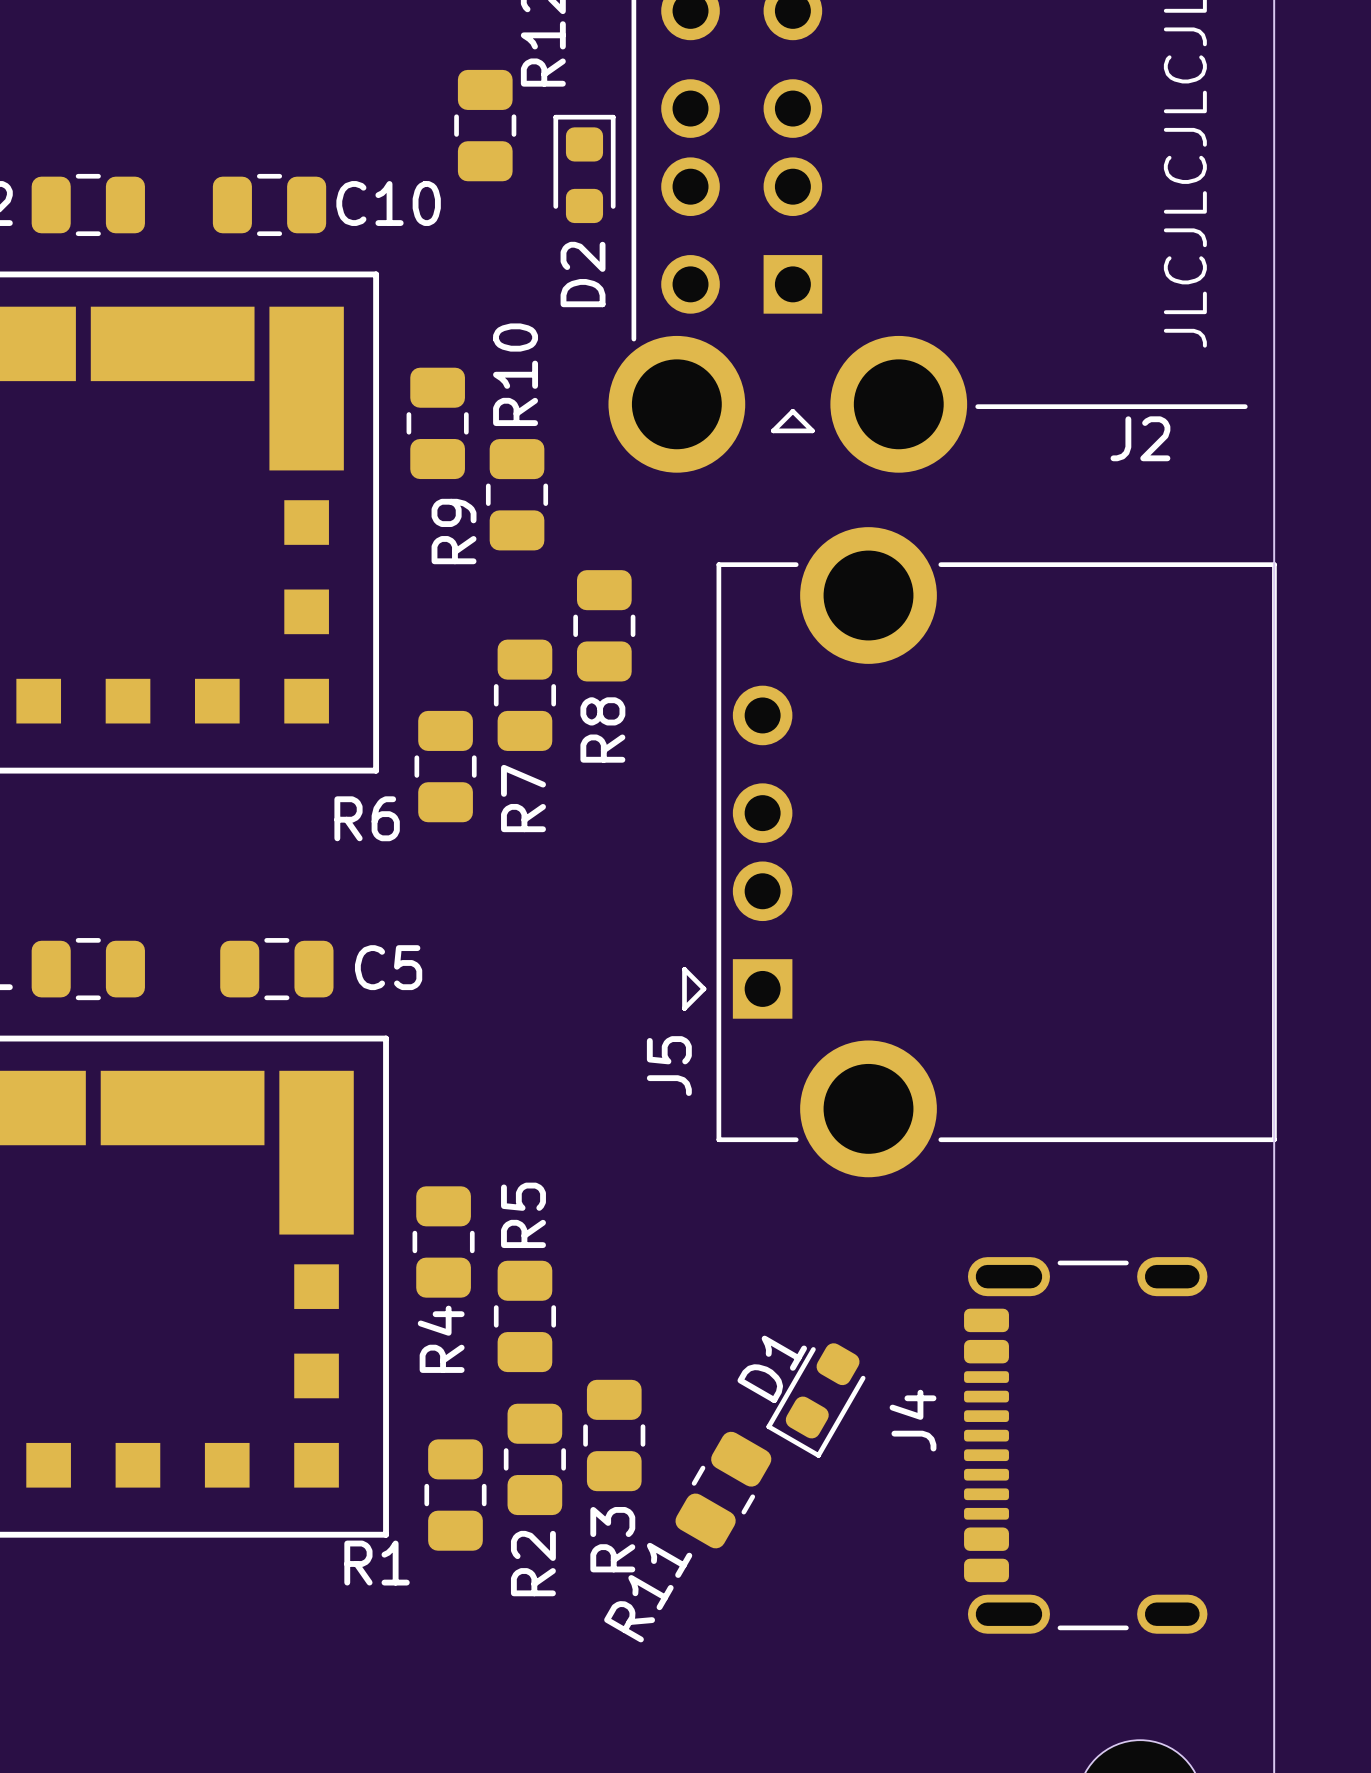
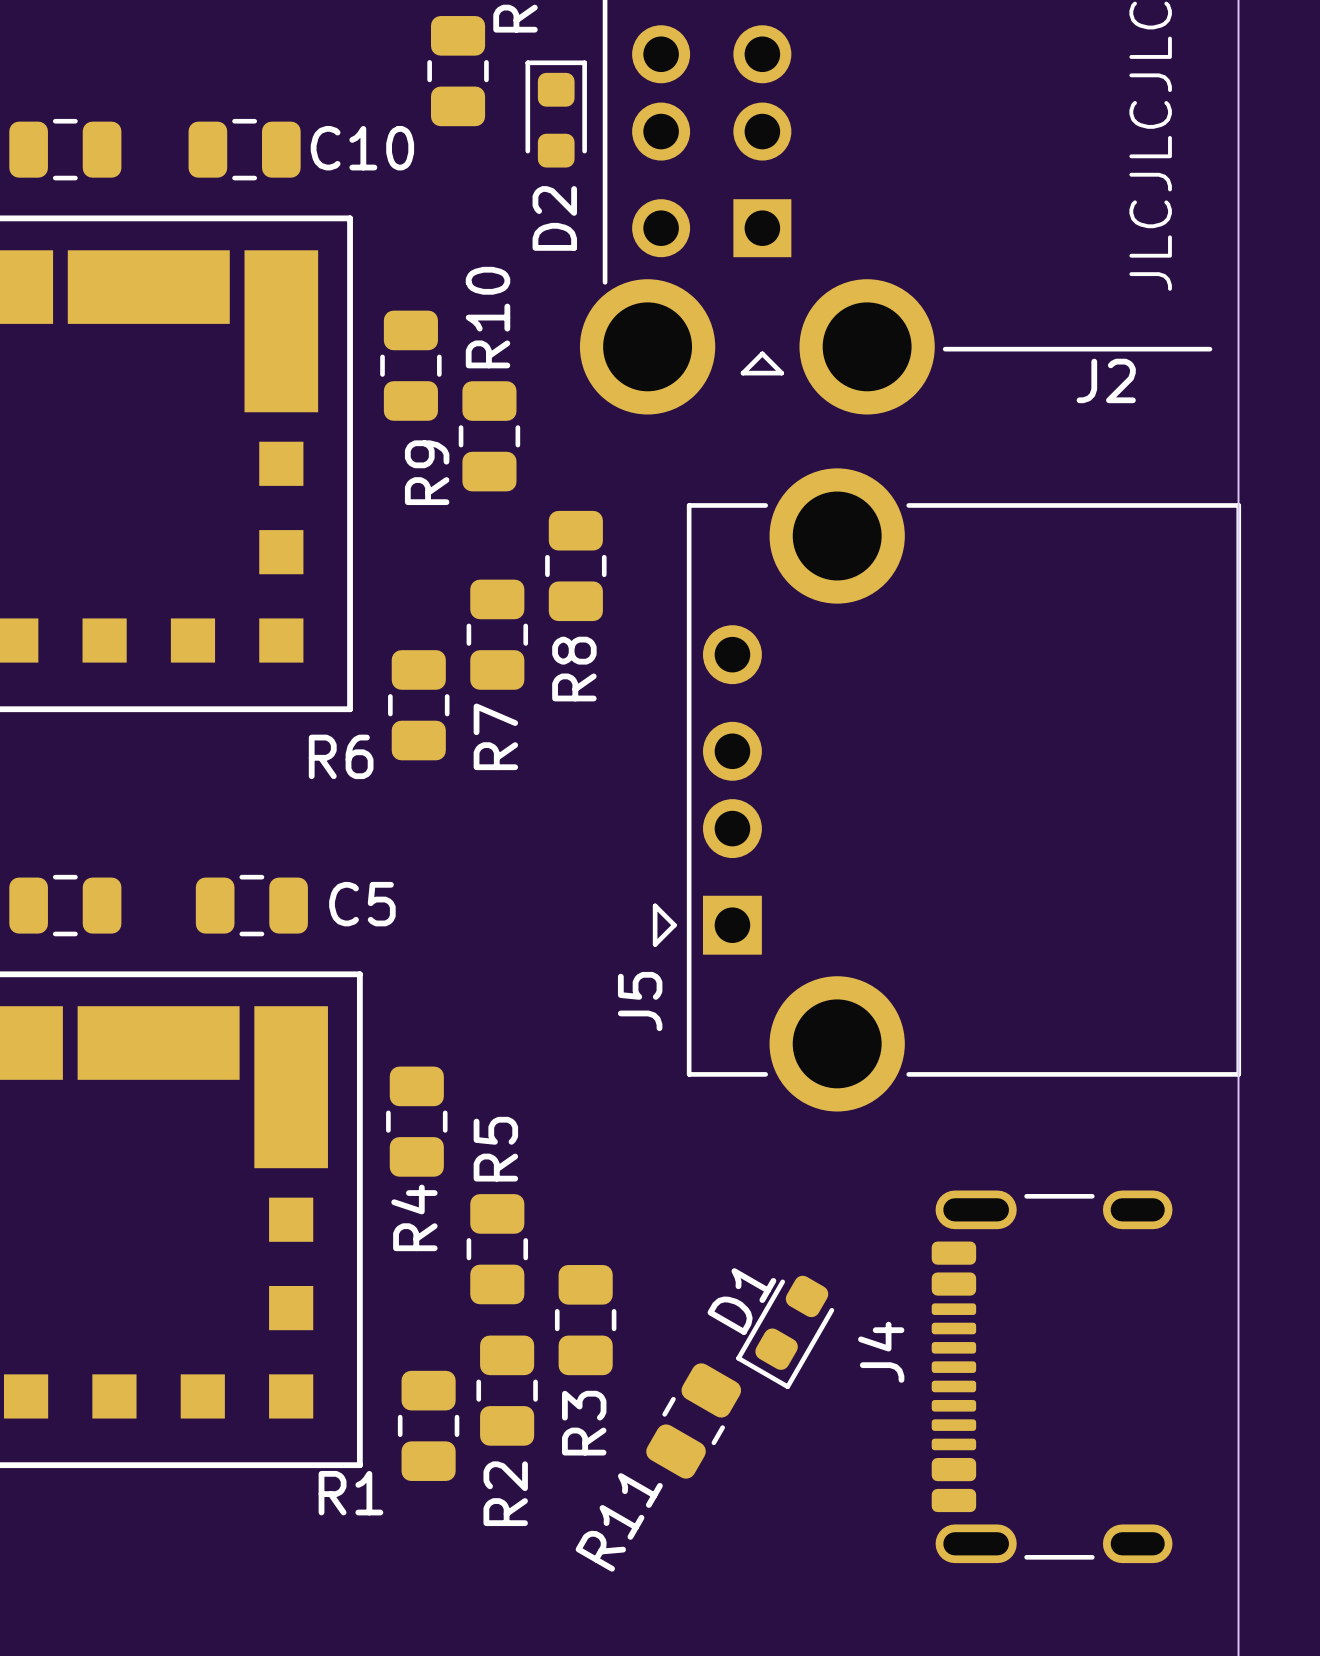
R4 position: (443, 1241) -> (416, 1121)
R3 position: (614, 1435) -> (585, 1320)

